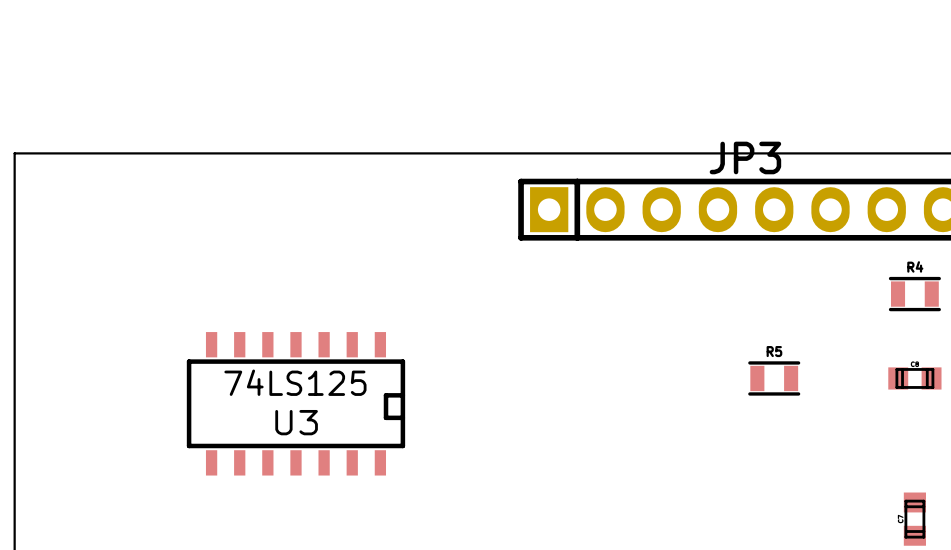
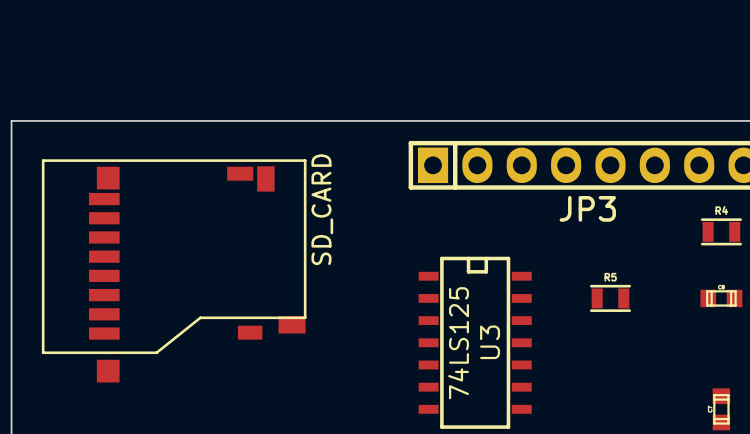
JP3 name position: JP3 (745, 157) -> JP3 (587, 208)
part: none -> SD_CARD (174, 270)
U3 rotation: 0° (295, 403) -> 90° counterclockwise (475, 342)
U3 position: (295, 403) -> (475, 342)

